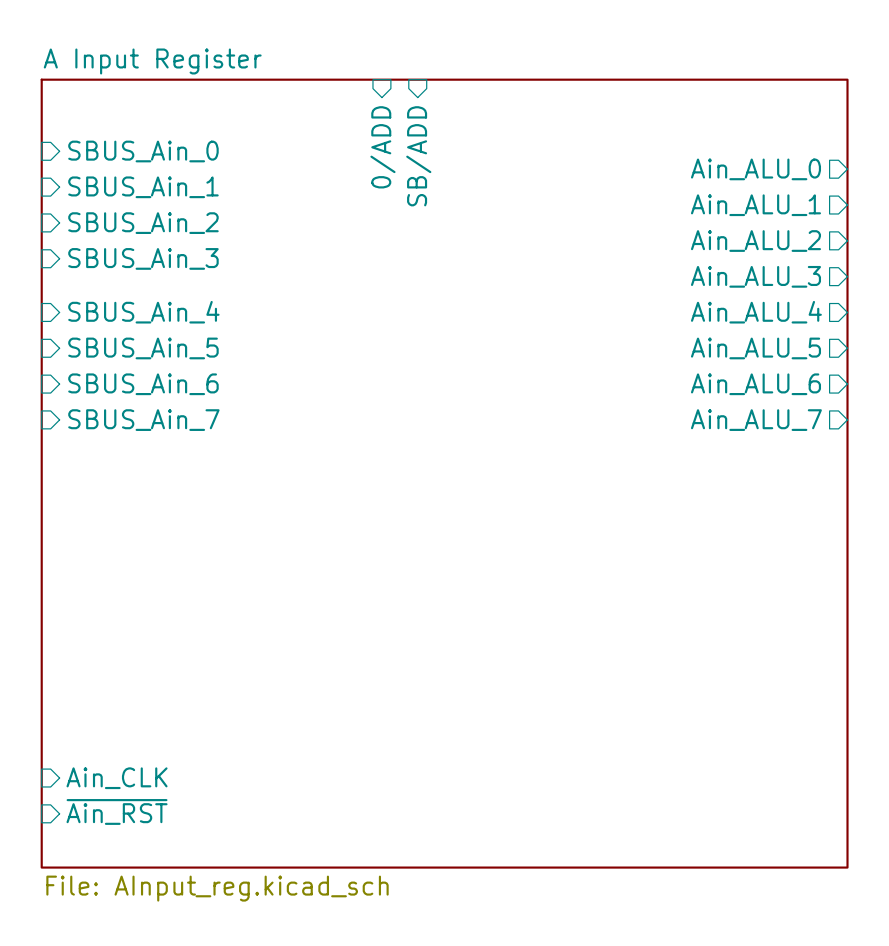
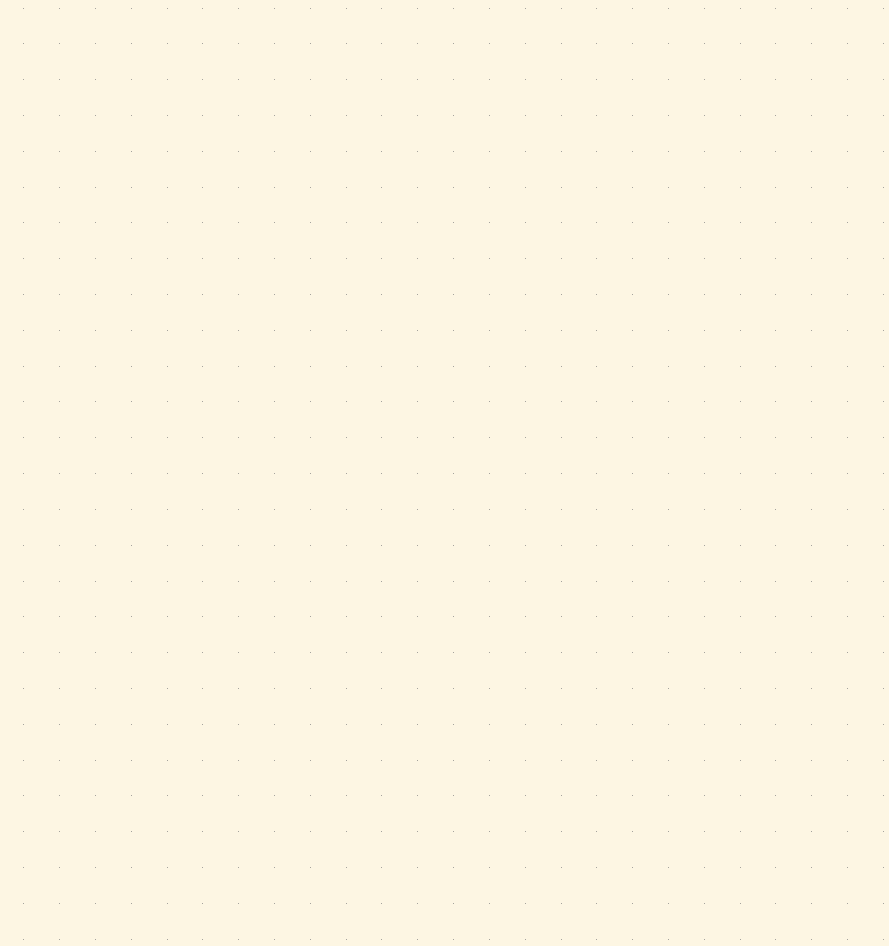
sheet pin: 0/ADD (382, 147) -> none
sheet pin: SBUS_Ain_0 (143, 151) -> none
sheet pin: SB/ADD (418, 156) -> none
sheet pin: Ain_ALU_0 (755, 169) -> none
sheet pin: SBUS_Ain_1 (143, 187) -> none
sheet pin: Ain_ALU_1 (755, 205) -> none
sheet pin: SBUS_Ain_2 (143, 223) -> none
sheet pin: Ain_ALU_2 (755, 241) -> none
sheet pin: SBUS_Ain_3 (143, 258) -> none
sheet pin: Ain_ALU_3 (755, 276) -> none
sheet pin: SBUS_Ain_4 (143, 312) -> none
sheet pin: Ain_ALU_4 (756, 312) -> none
sheet pin: SBUS_Ain_5 (143, 348) -> none
sheet pin: Ain_ALU_5 (755, 348) -> none
sheet pin: SBUS_Ain_6 (143, 384) -> none
sheet pin: Ain_ALU_6 (755, 384) -> none
sheet pin: SBUS_Ain_7 (143, 420) -> none
sheet pin: Ain_ALU_7 (756, 420) -> none
sheet A Input Register: File: AInput_reg.kicad_sch (444, 473) -> none
sheet pin: Ain_CLK (117, 778) -> none
sheet pin: ~{Ain_RST} (117, 811) -> none

